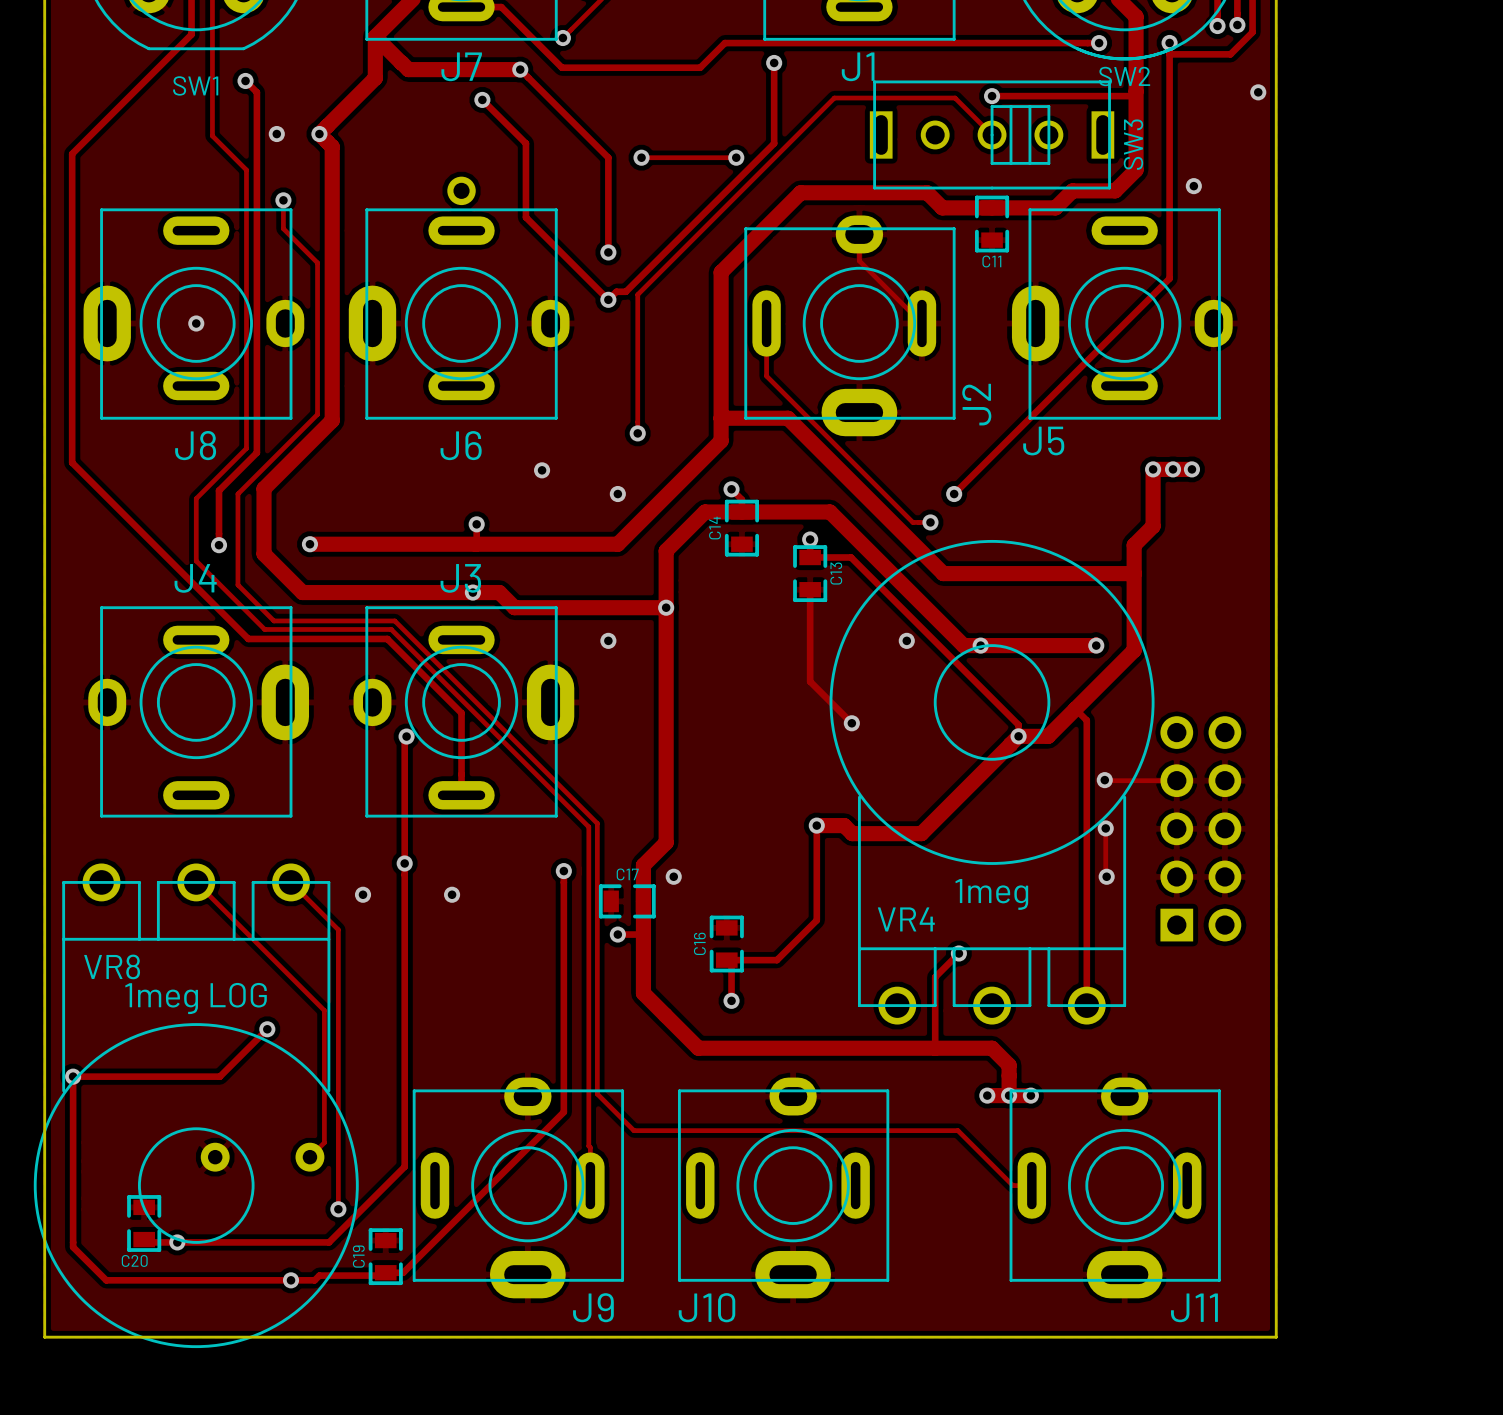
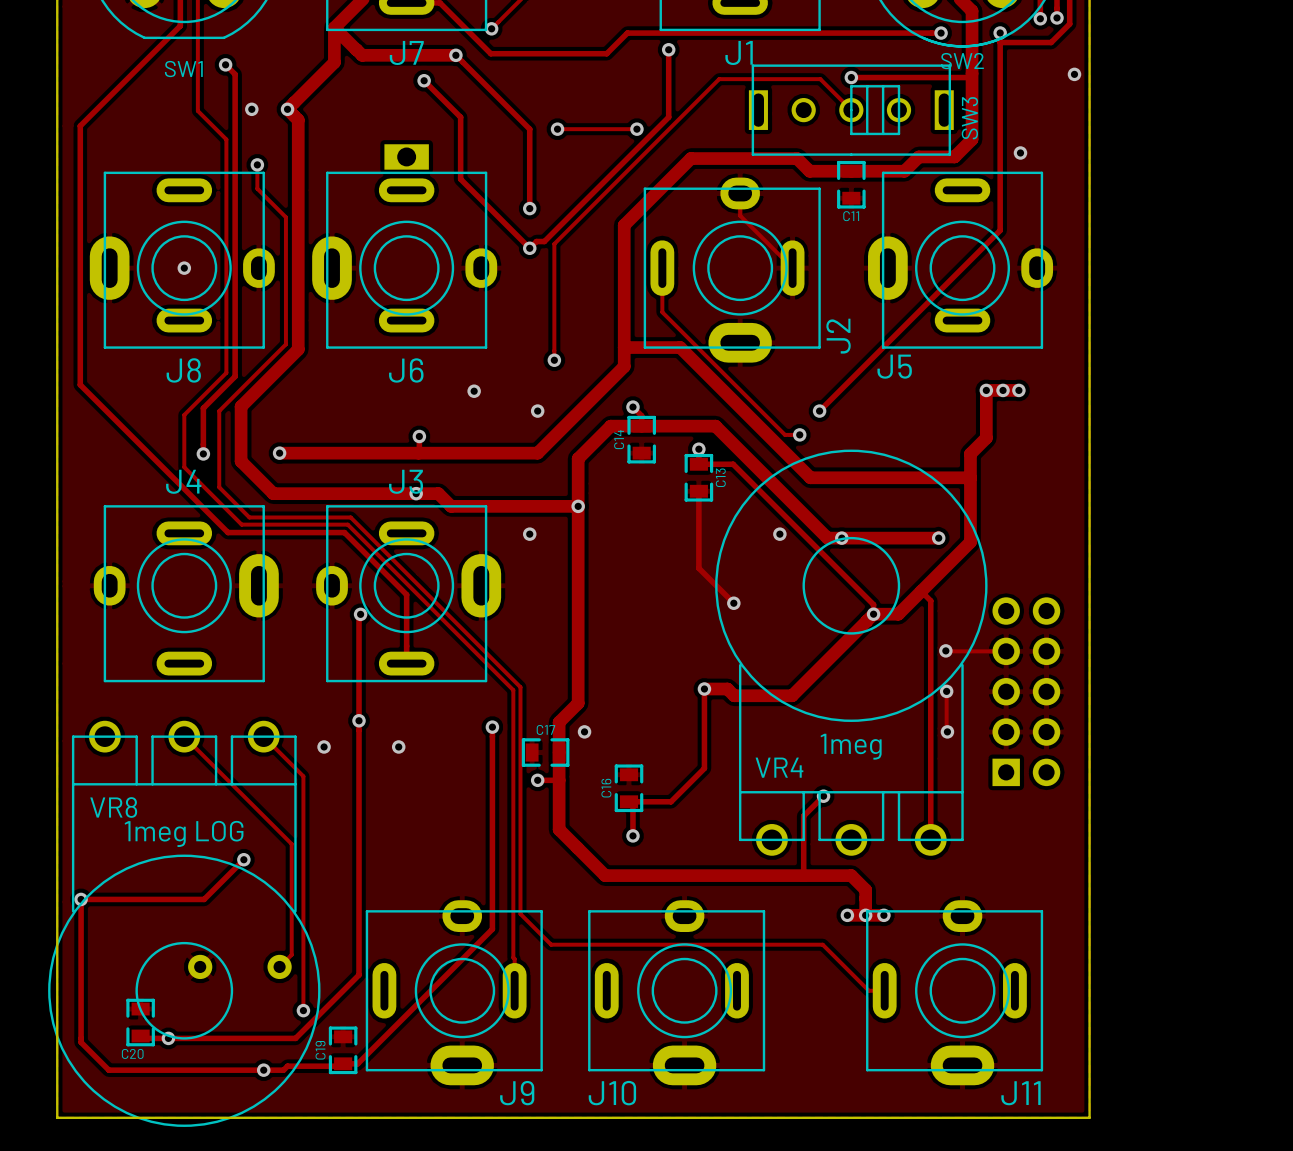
part footprint: [447, 176, 476, 206] -> [384, 144, 429, 170]

